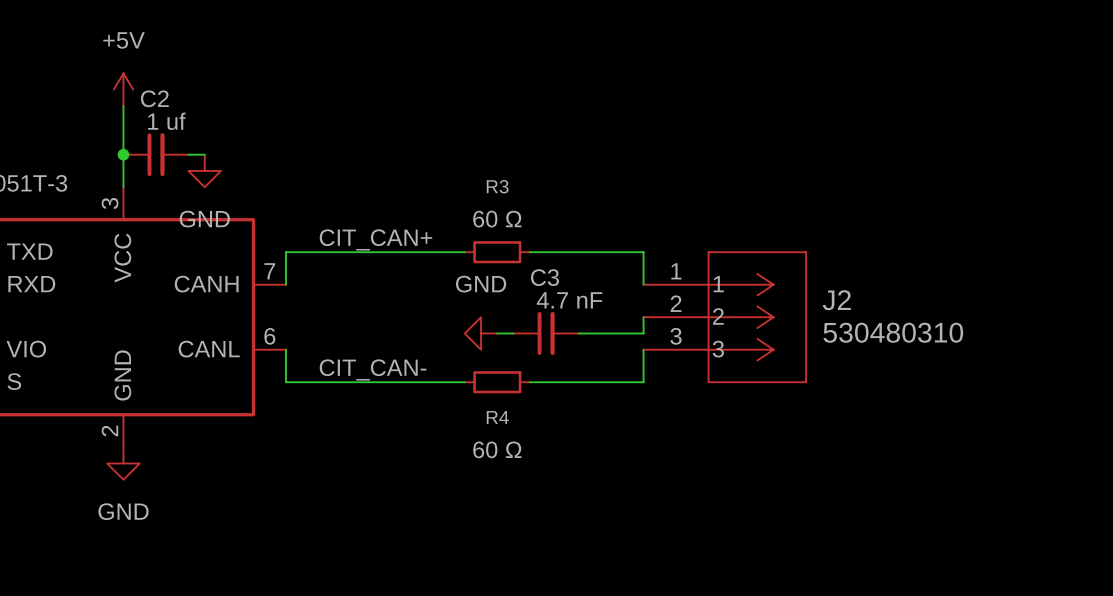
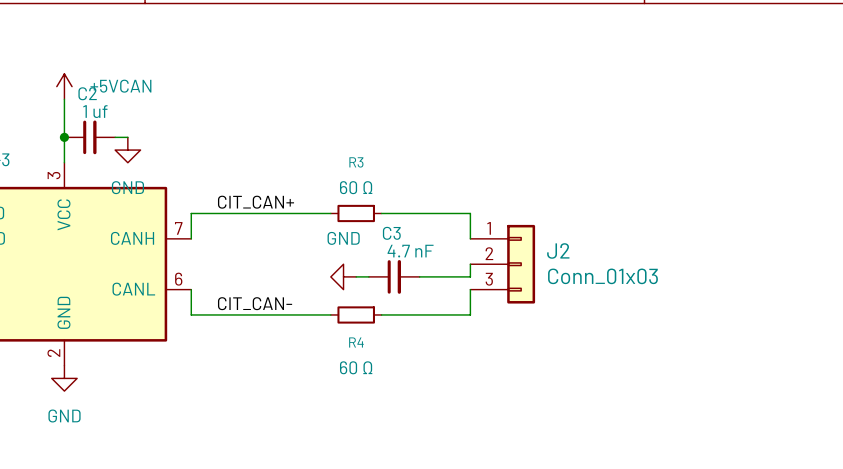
power symbol: +5V (123, 89) -> +5VCAN (64, 86)
J2 symbol: [643, 251, 807, 384] -> [470, 224, 536, 304]
J2 name position: J2 (836, 300) -> J2 (558, 250)
J2 value: 530480310 (893, 332) -> Conn_01x03 (602, 276)

